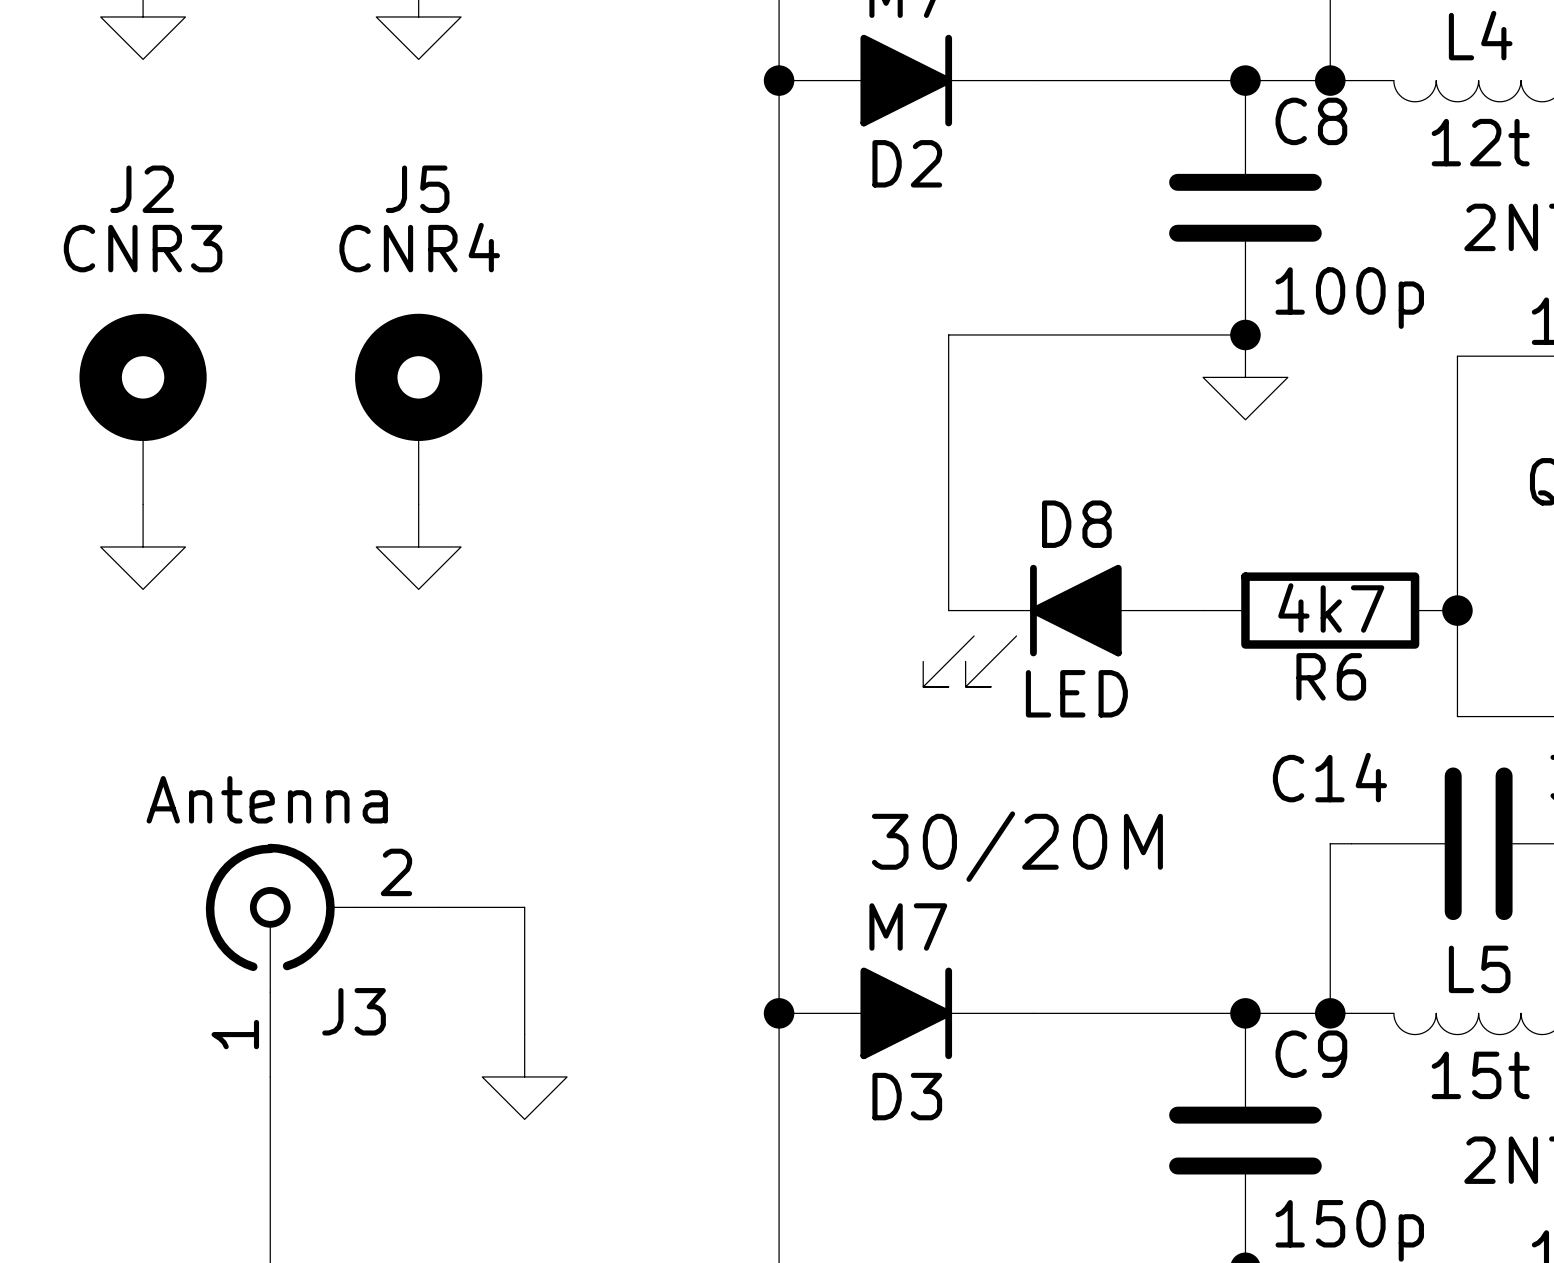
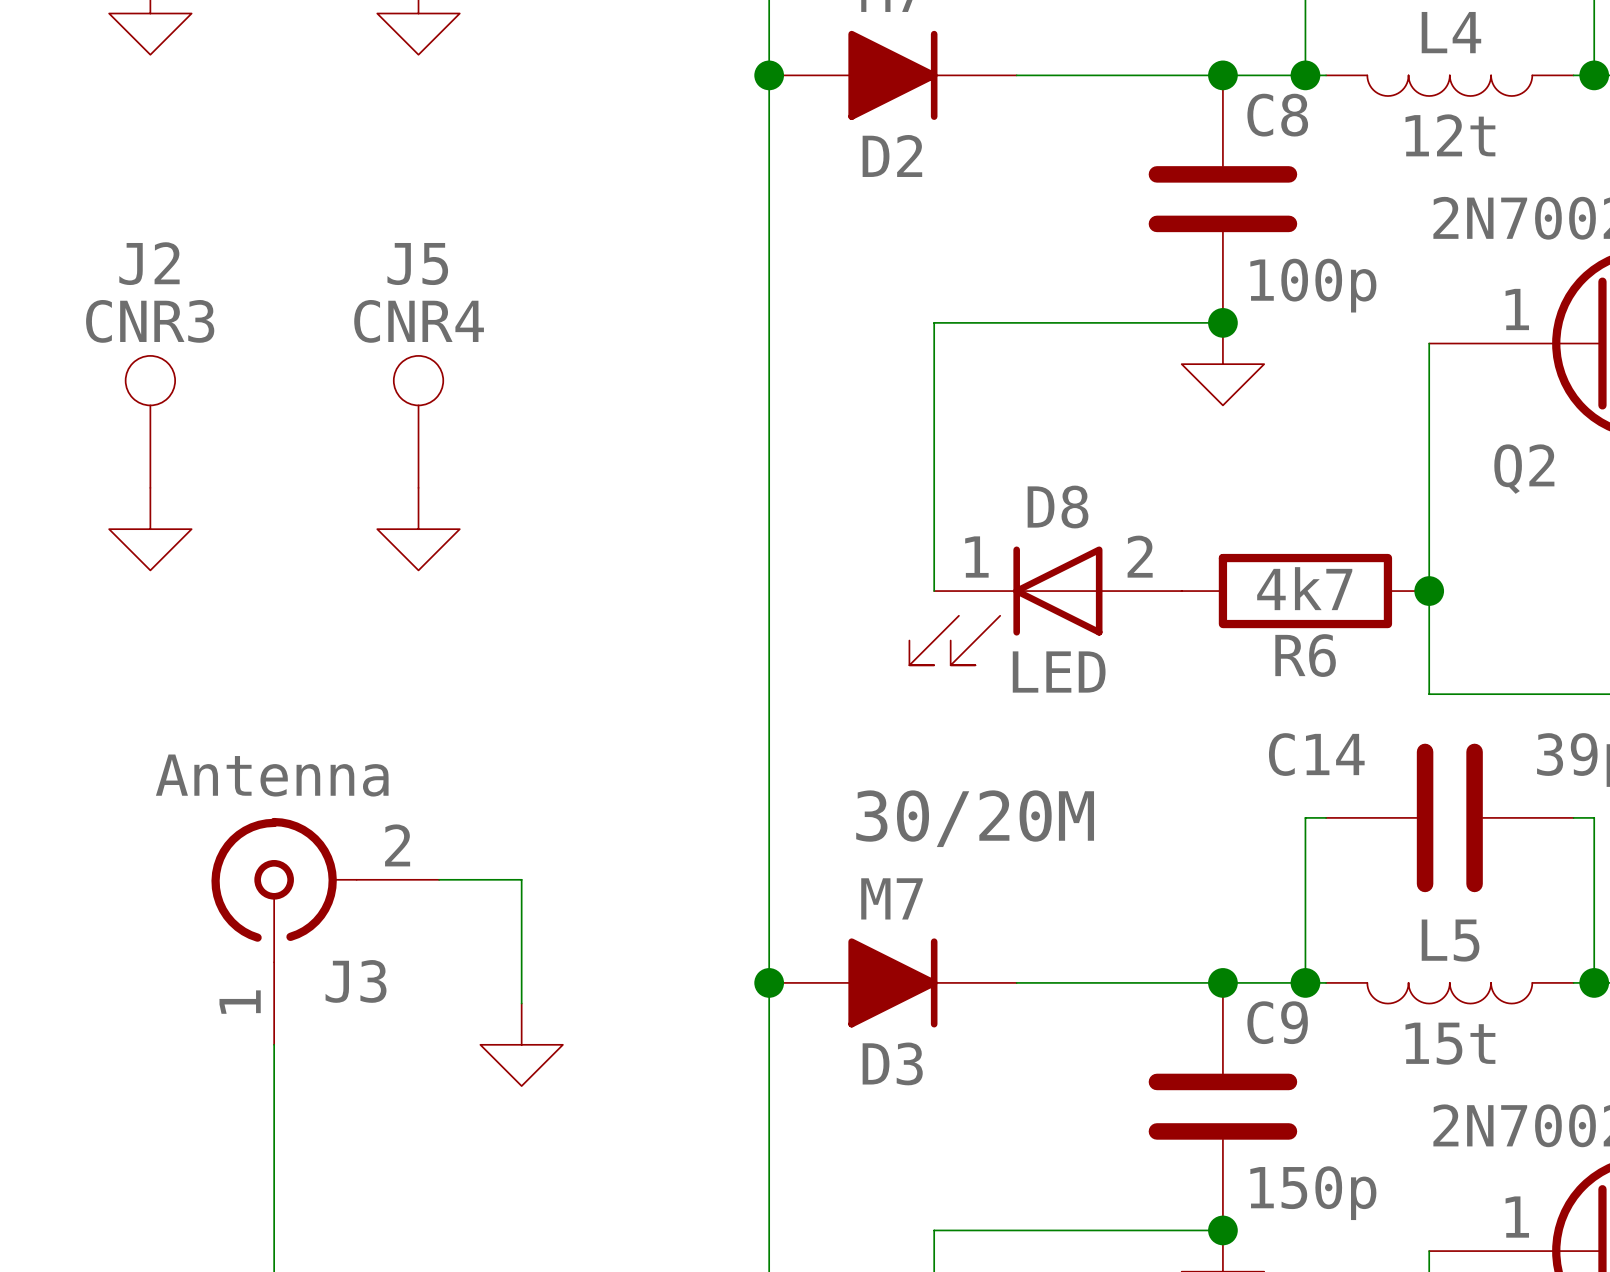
J2 symbol: [79, 313, 207, 505] -> [125, 355, 176, 488]
J5 symbol: [355, 313, 483, 505] -> [393, 355, 444, 488]
D8 symbol: [923, 564, 1204, 687] -> [909, 546, 1182, 666]

